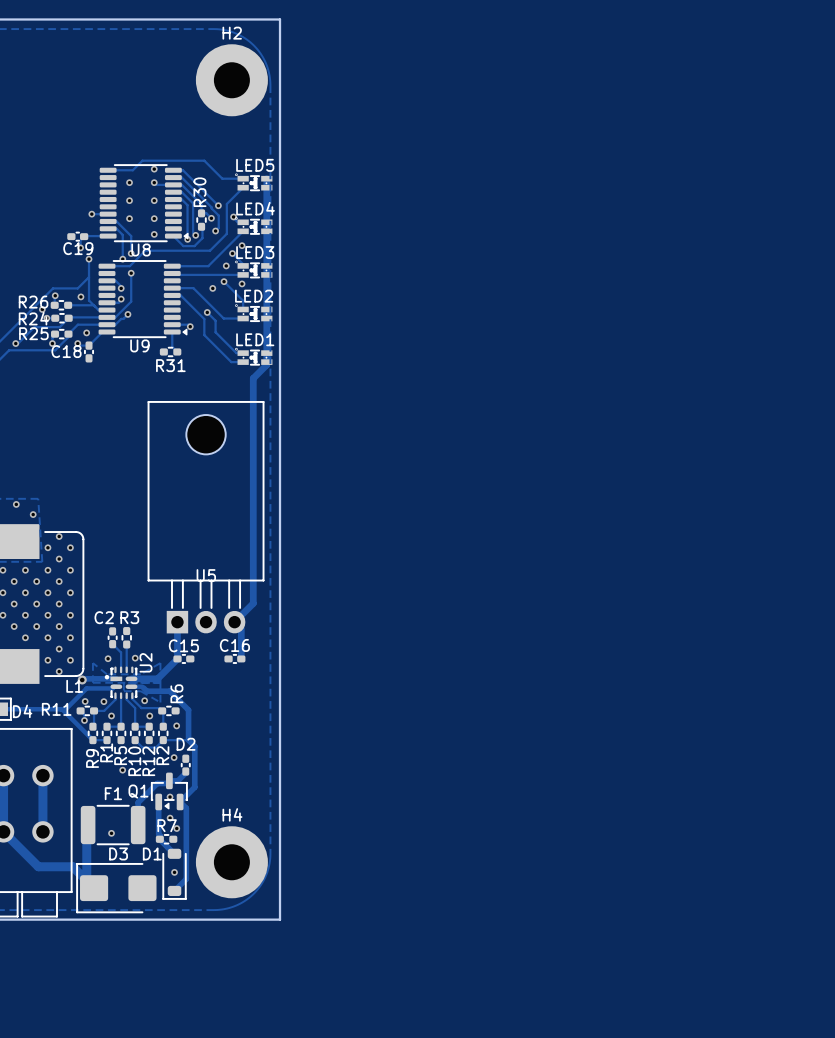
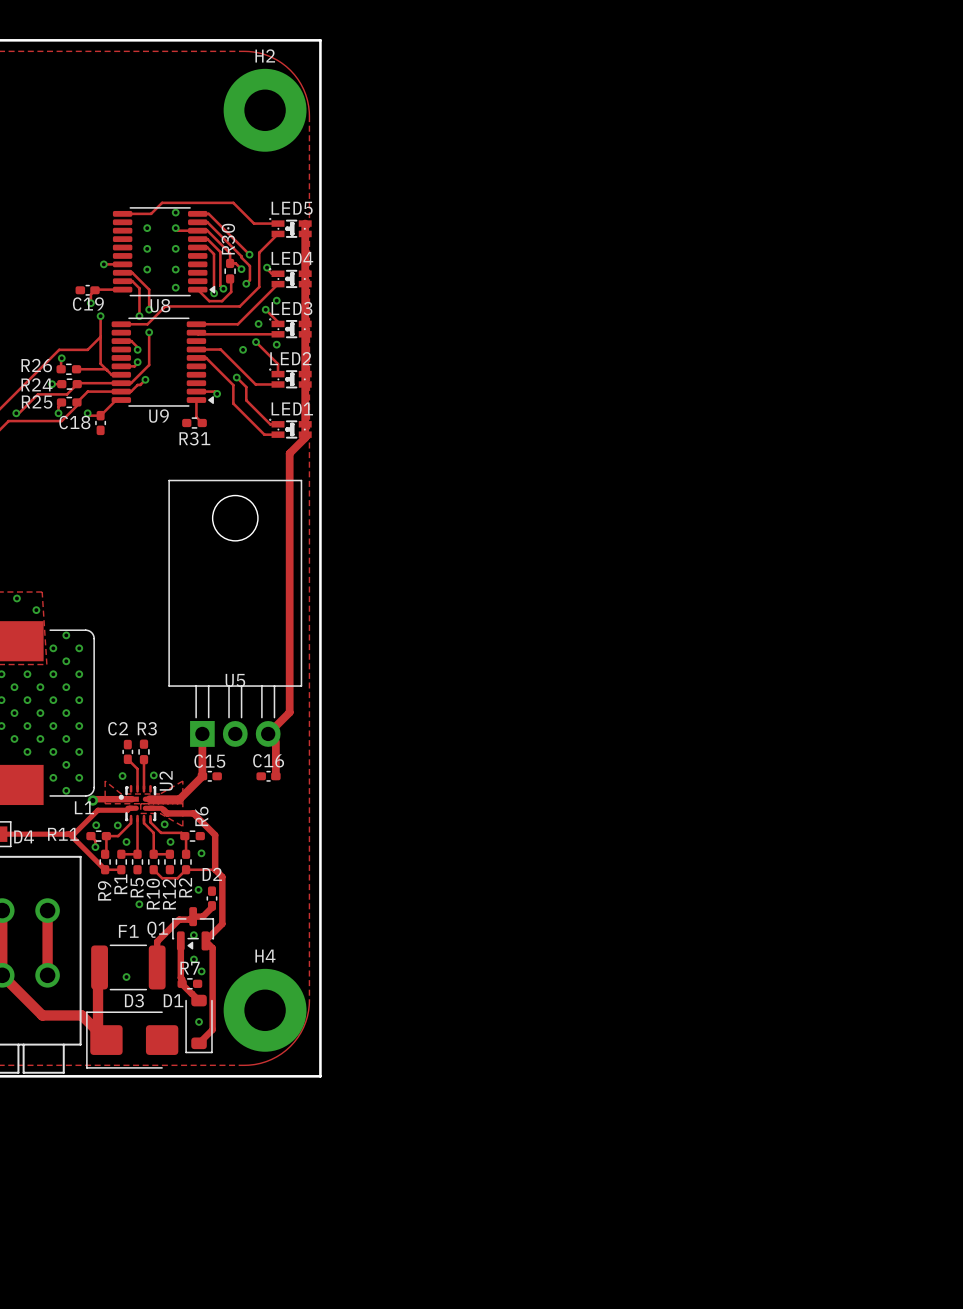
via: (80, 296) -> none
via: (42, 309) -> none
via: (86, 332) -> none

